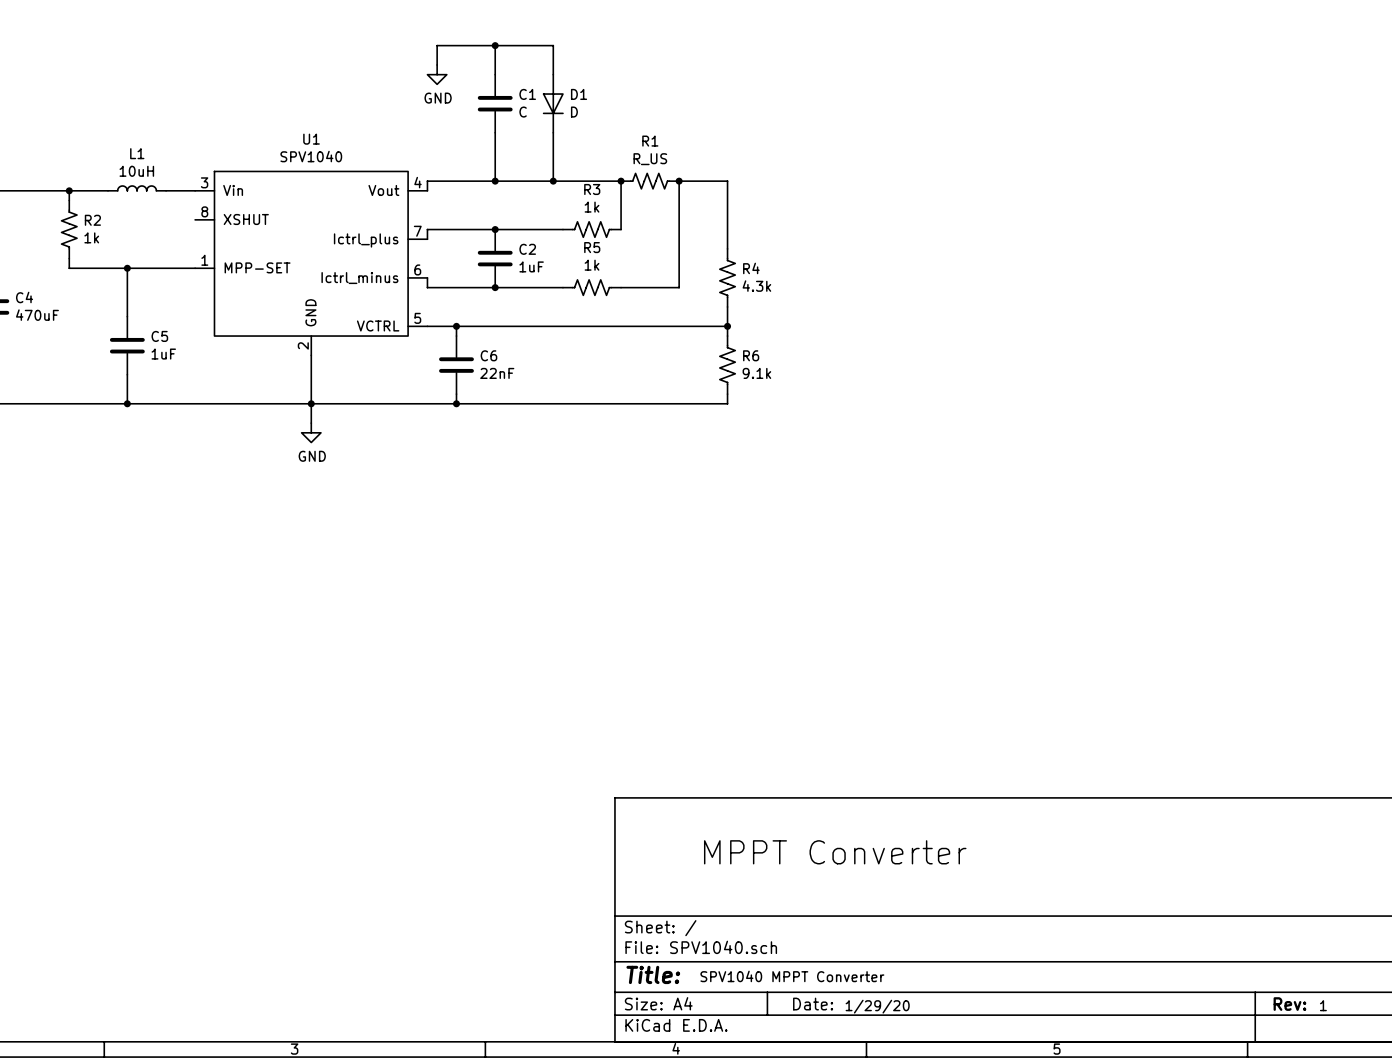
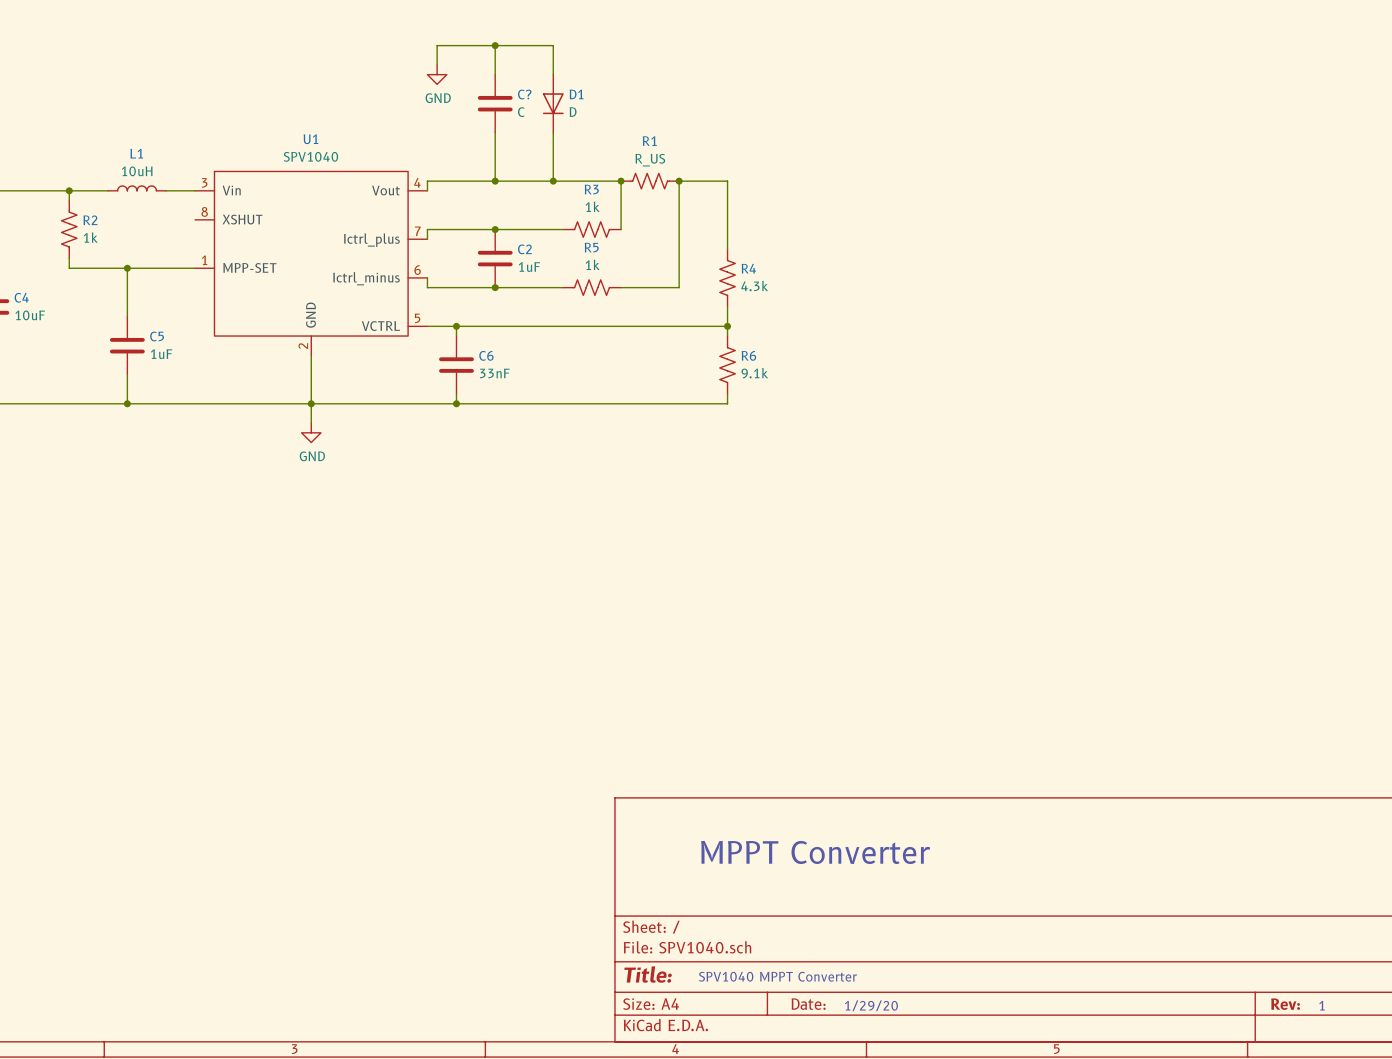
C1 name: C1 (527, 94) -> C? (524, 94)
C4 value: 470uF (37, 315) -> 10uF (30, 315)
C6 value: 22nF (497, 373) -> 33nF (494, 373)

